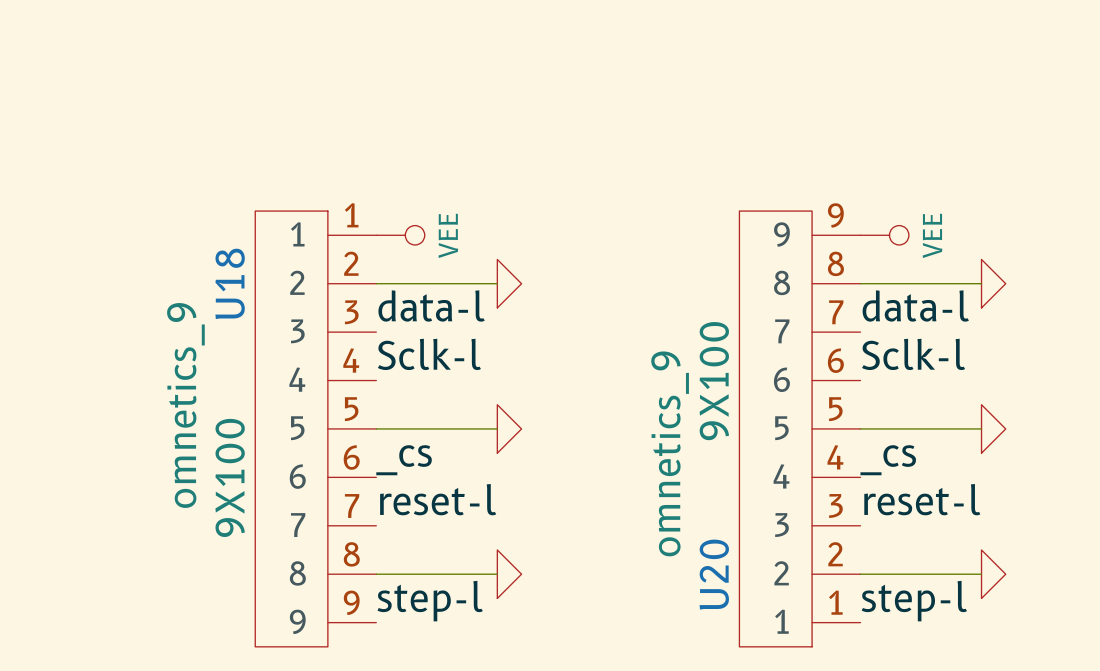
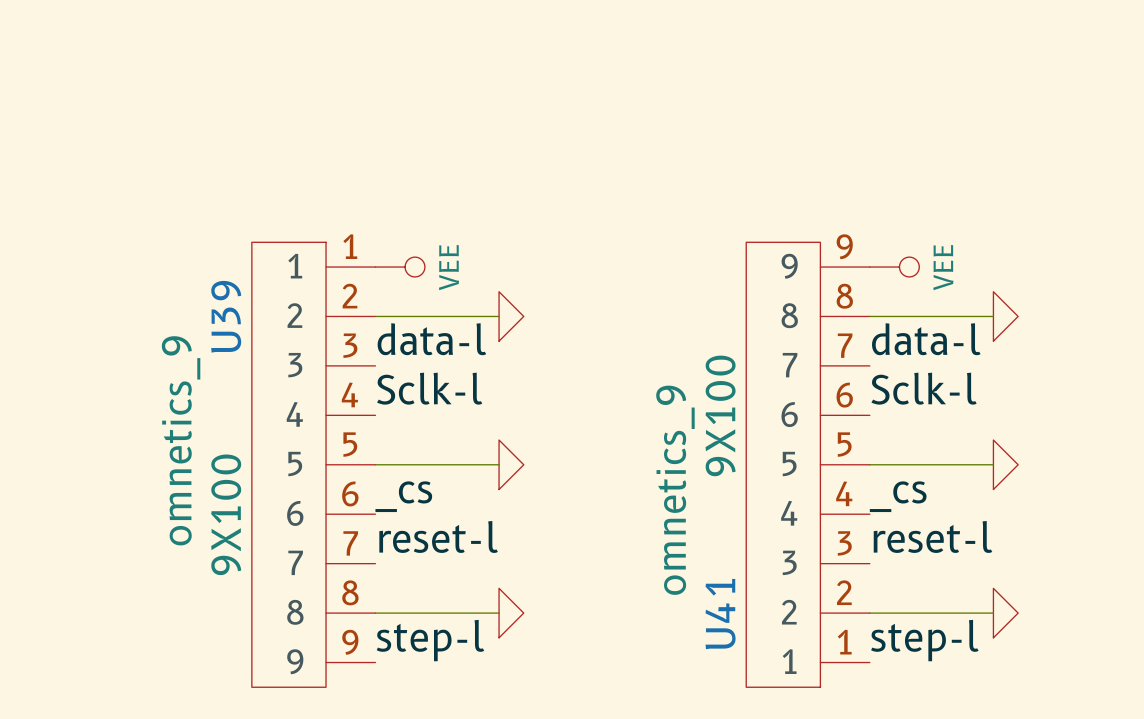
U18 name: U18 (230, 283) -> U39 (226, 316)
U20 name: U20 (714, 574) -> U41 (720, 614)

